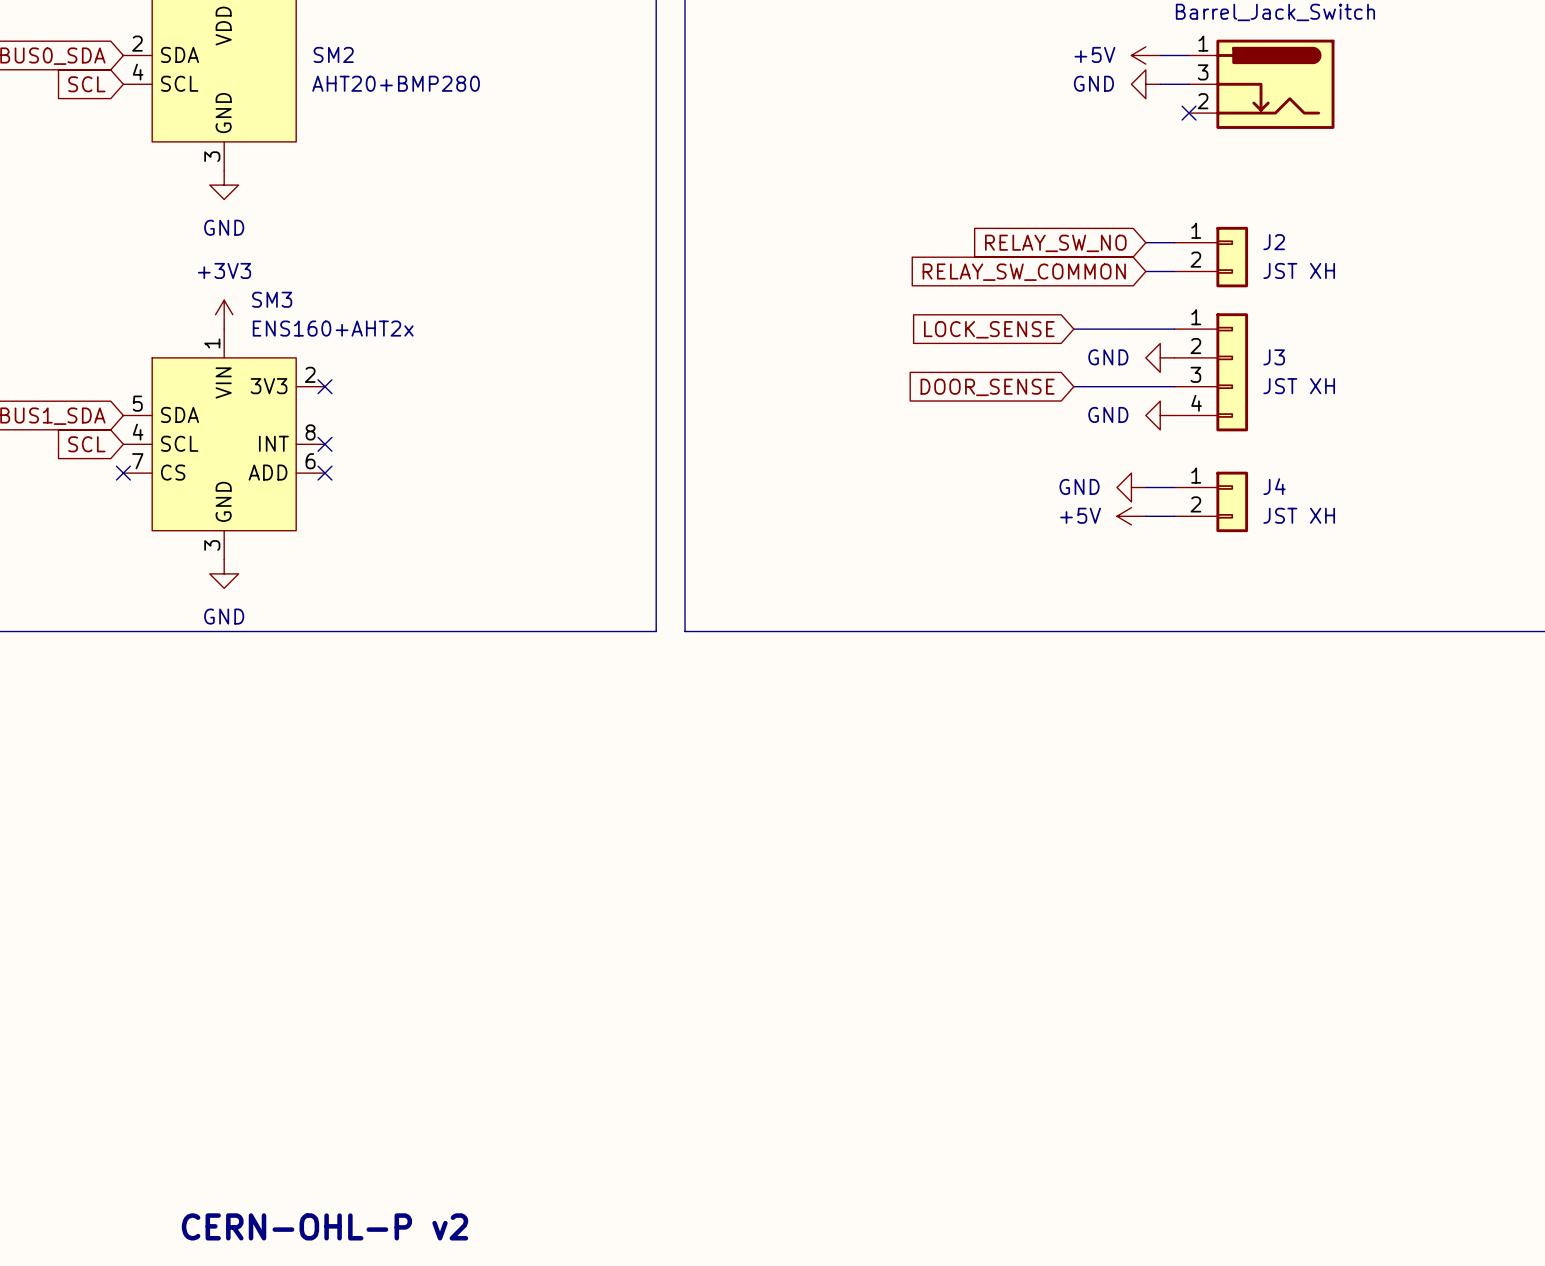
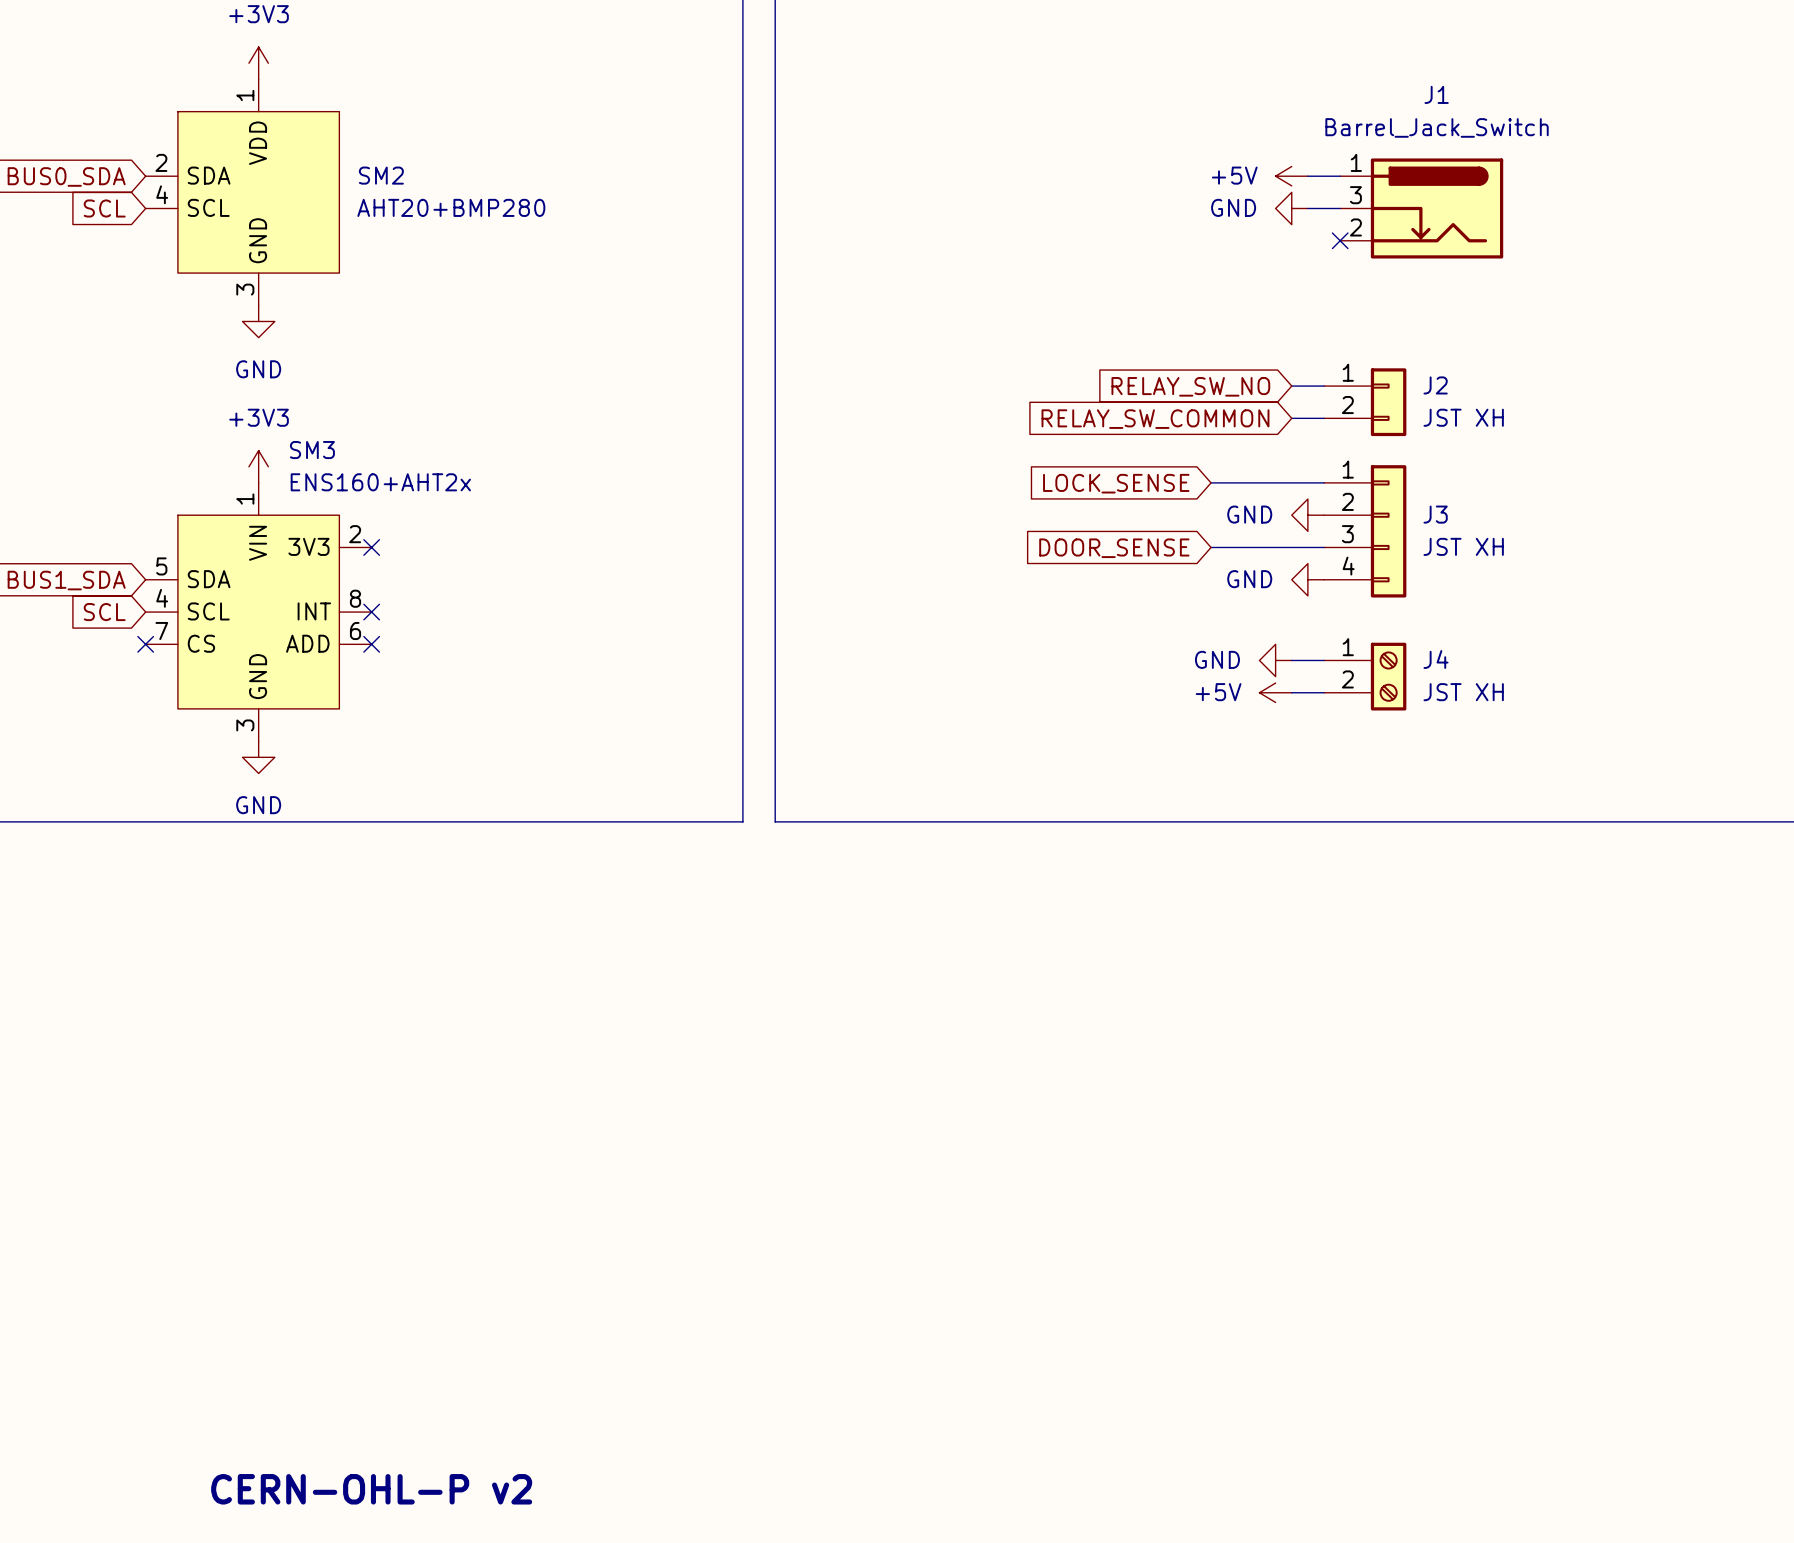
J4 symbol: [1174, 471, 1249, 533] -> [1324, 642, 1407, 711]

